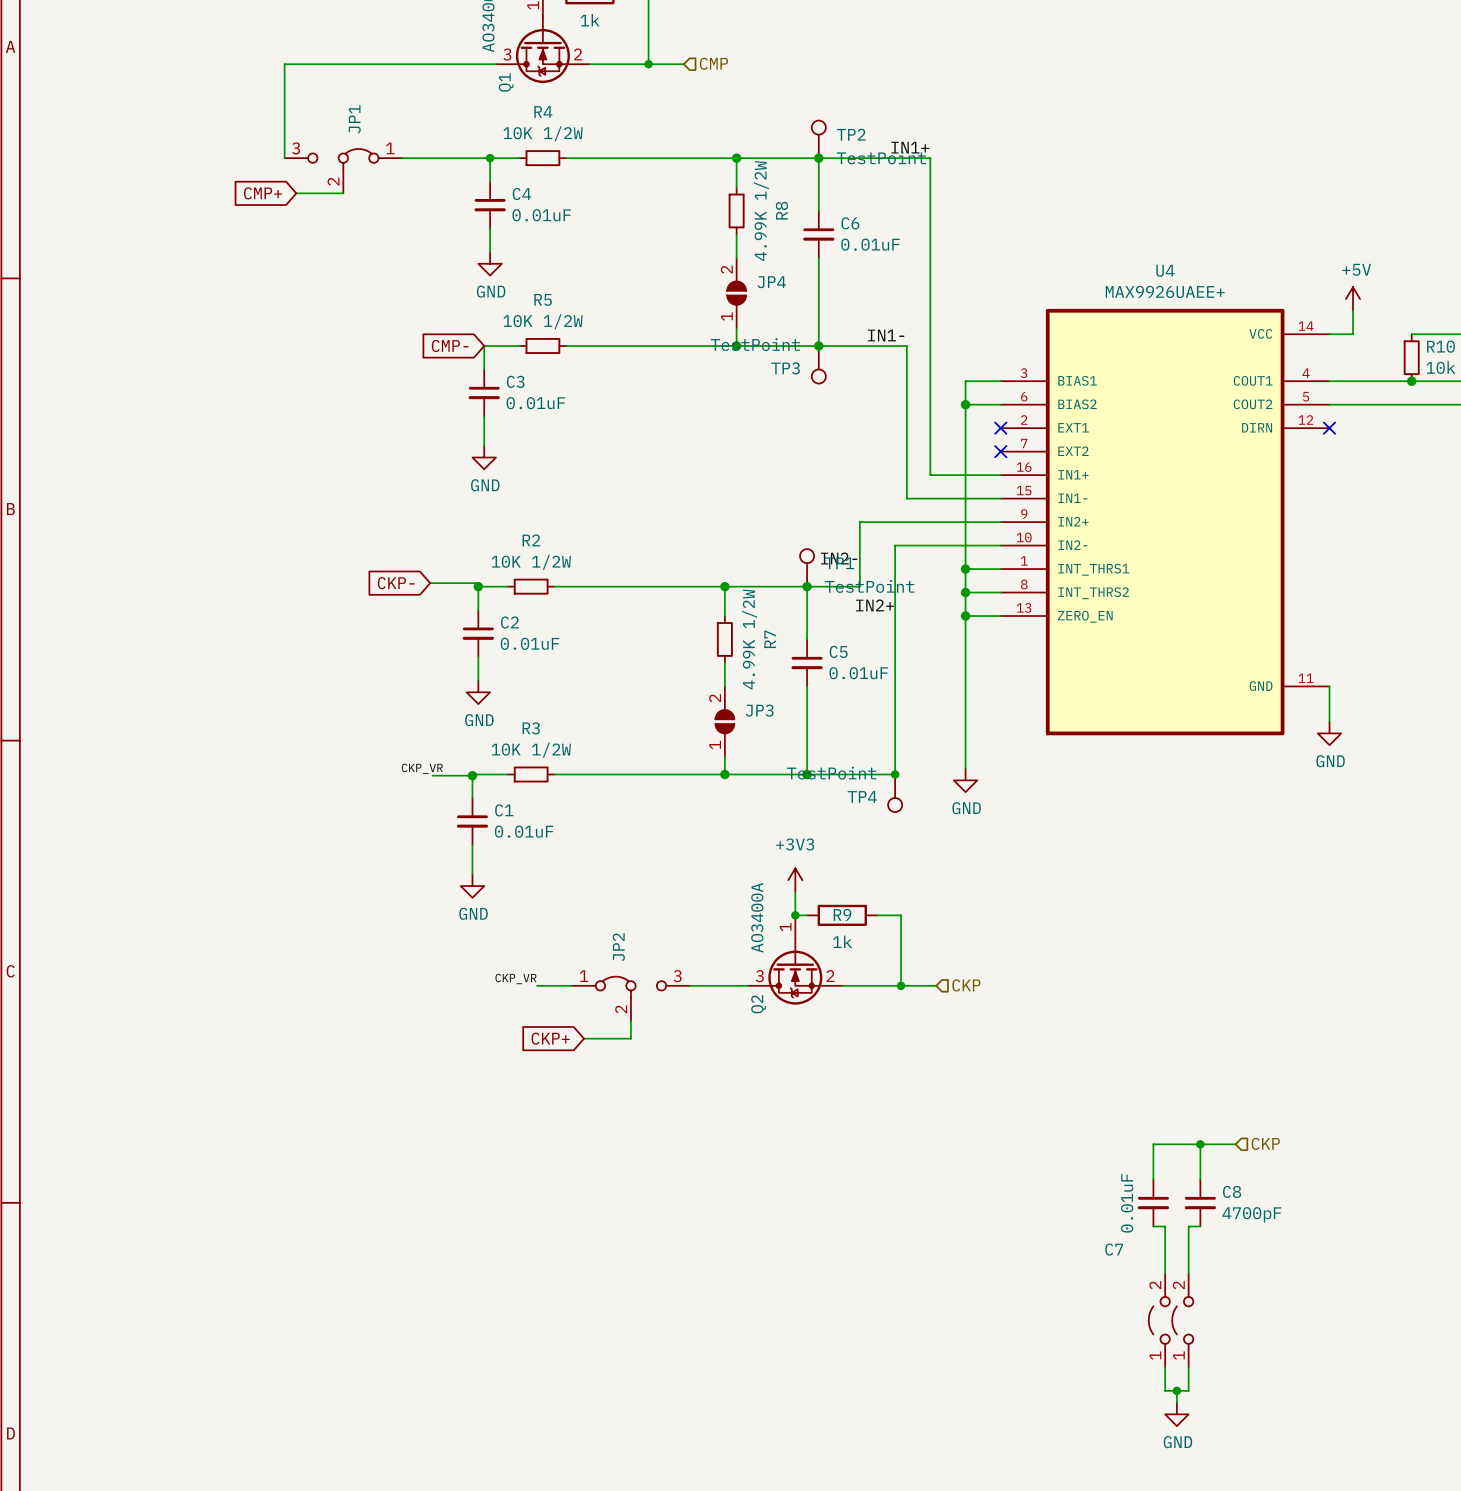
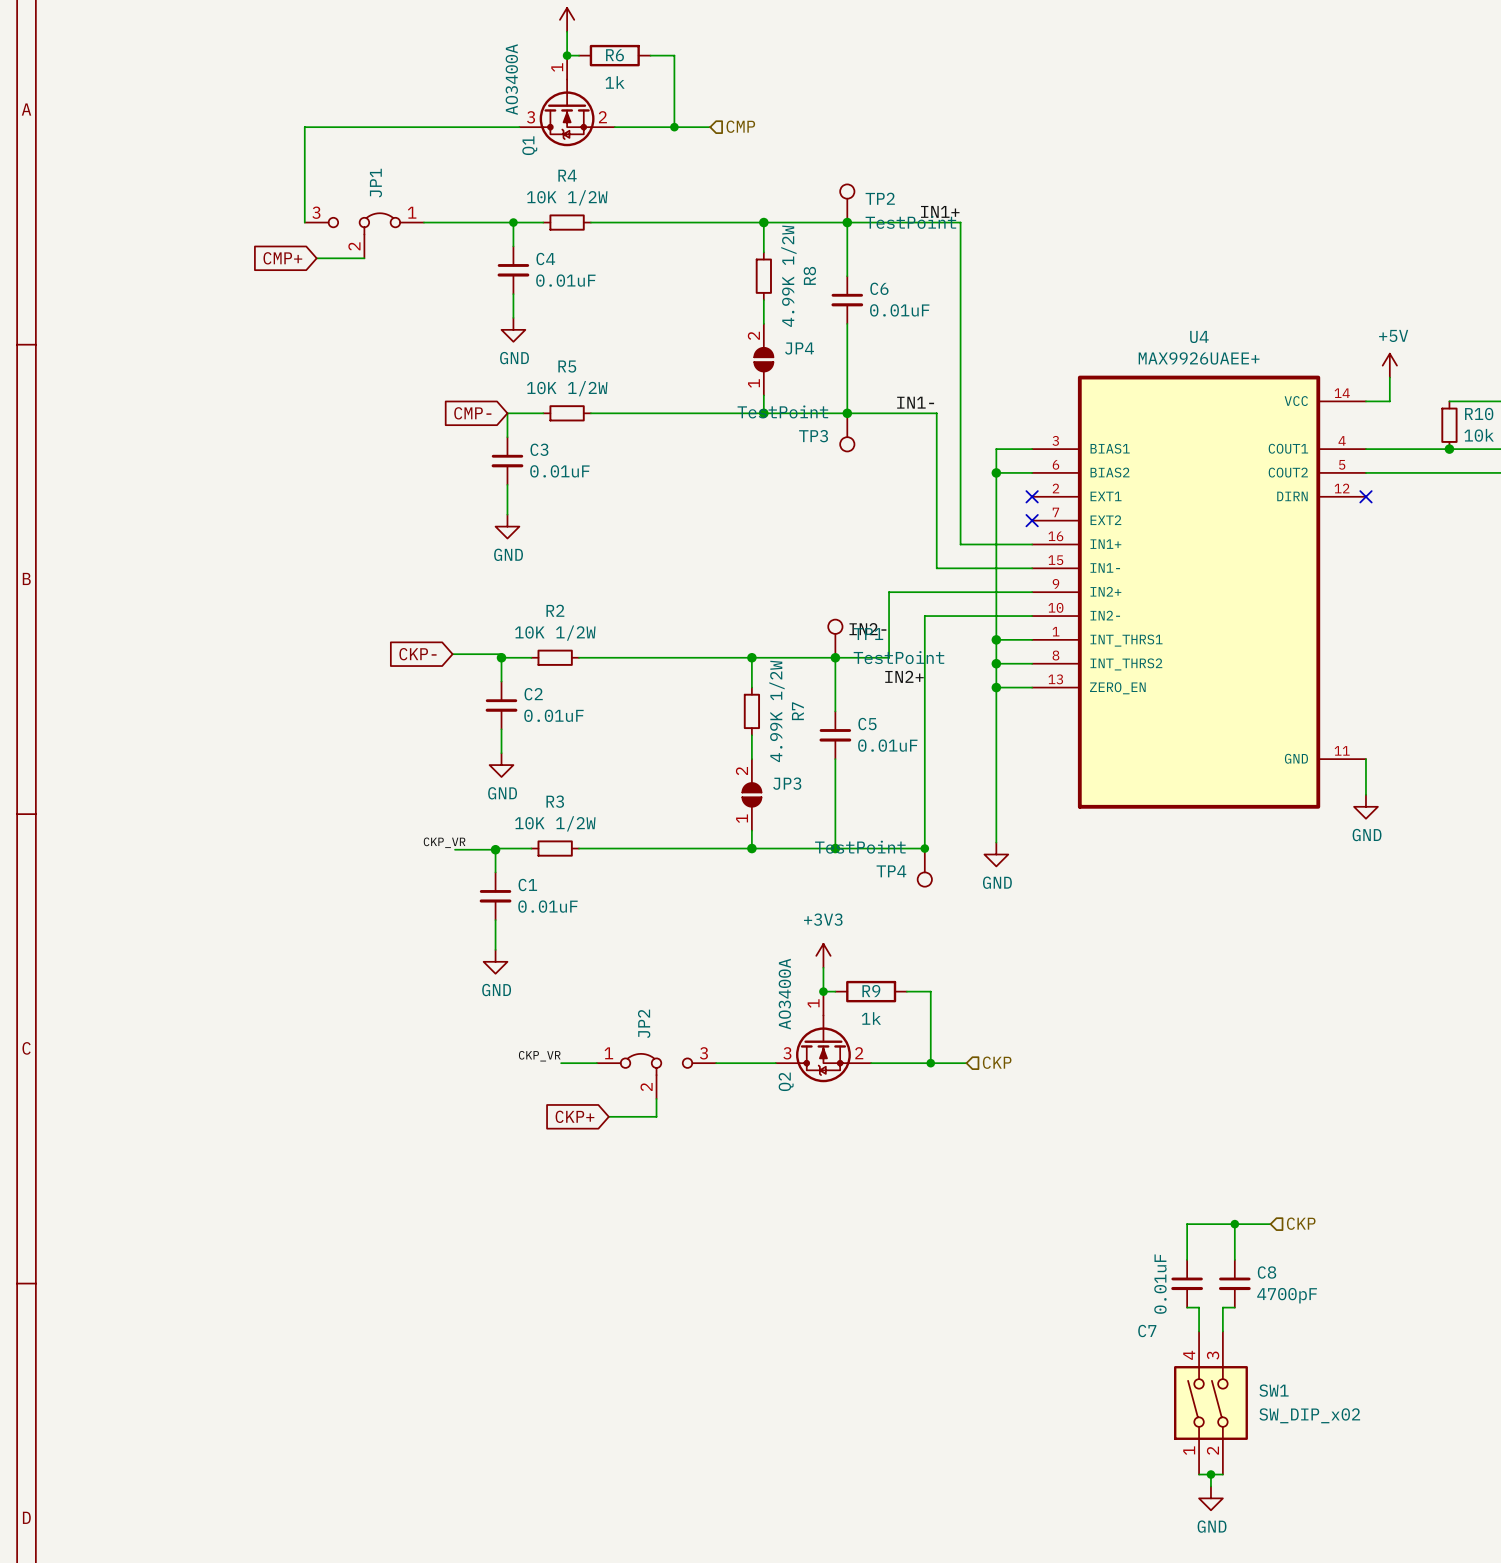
part: (1159, 1320) -> none
SW1: none -> SW_DIP_x02 (1210, 1402)
part: (1182, 1320) -> none

